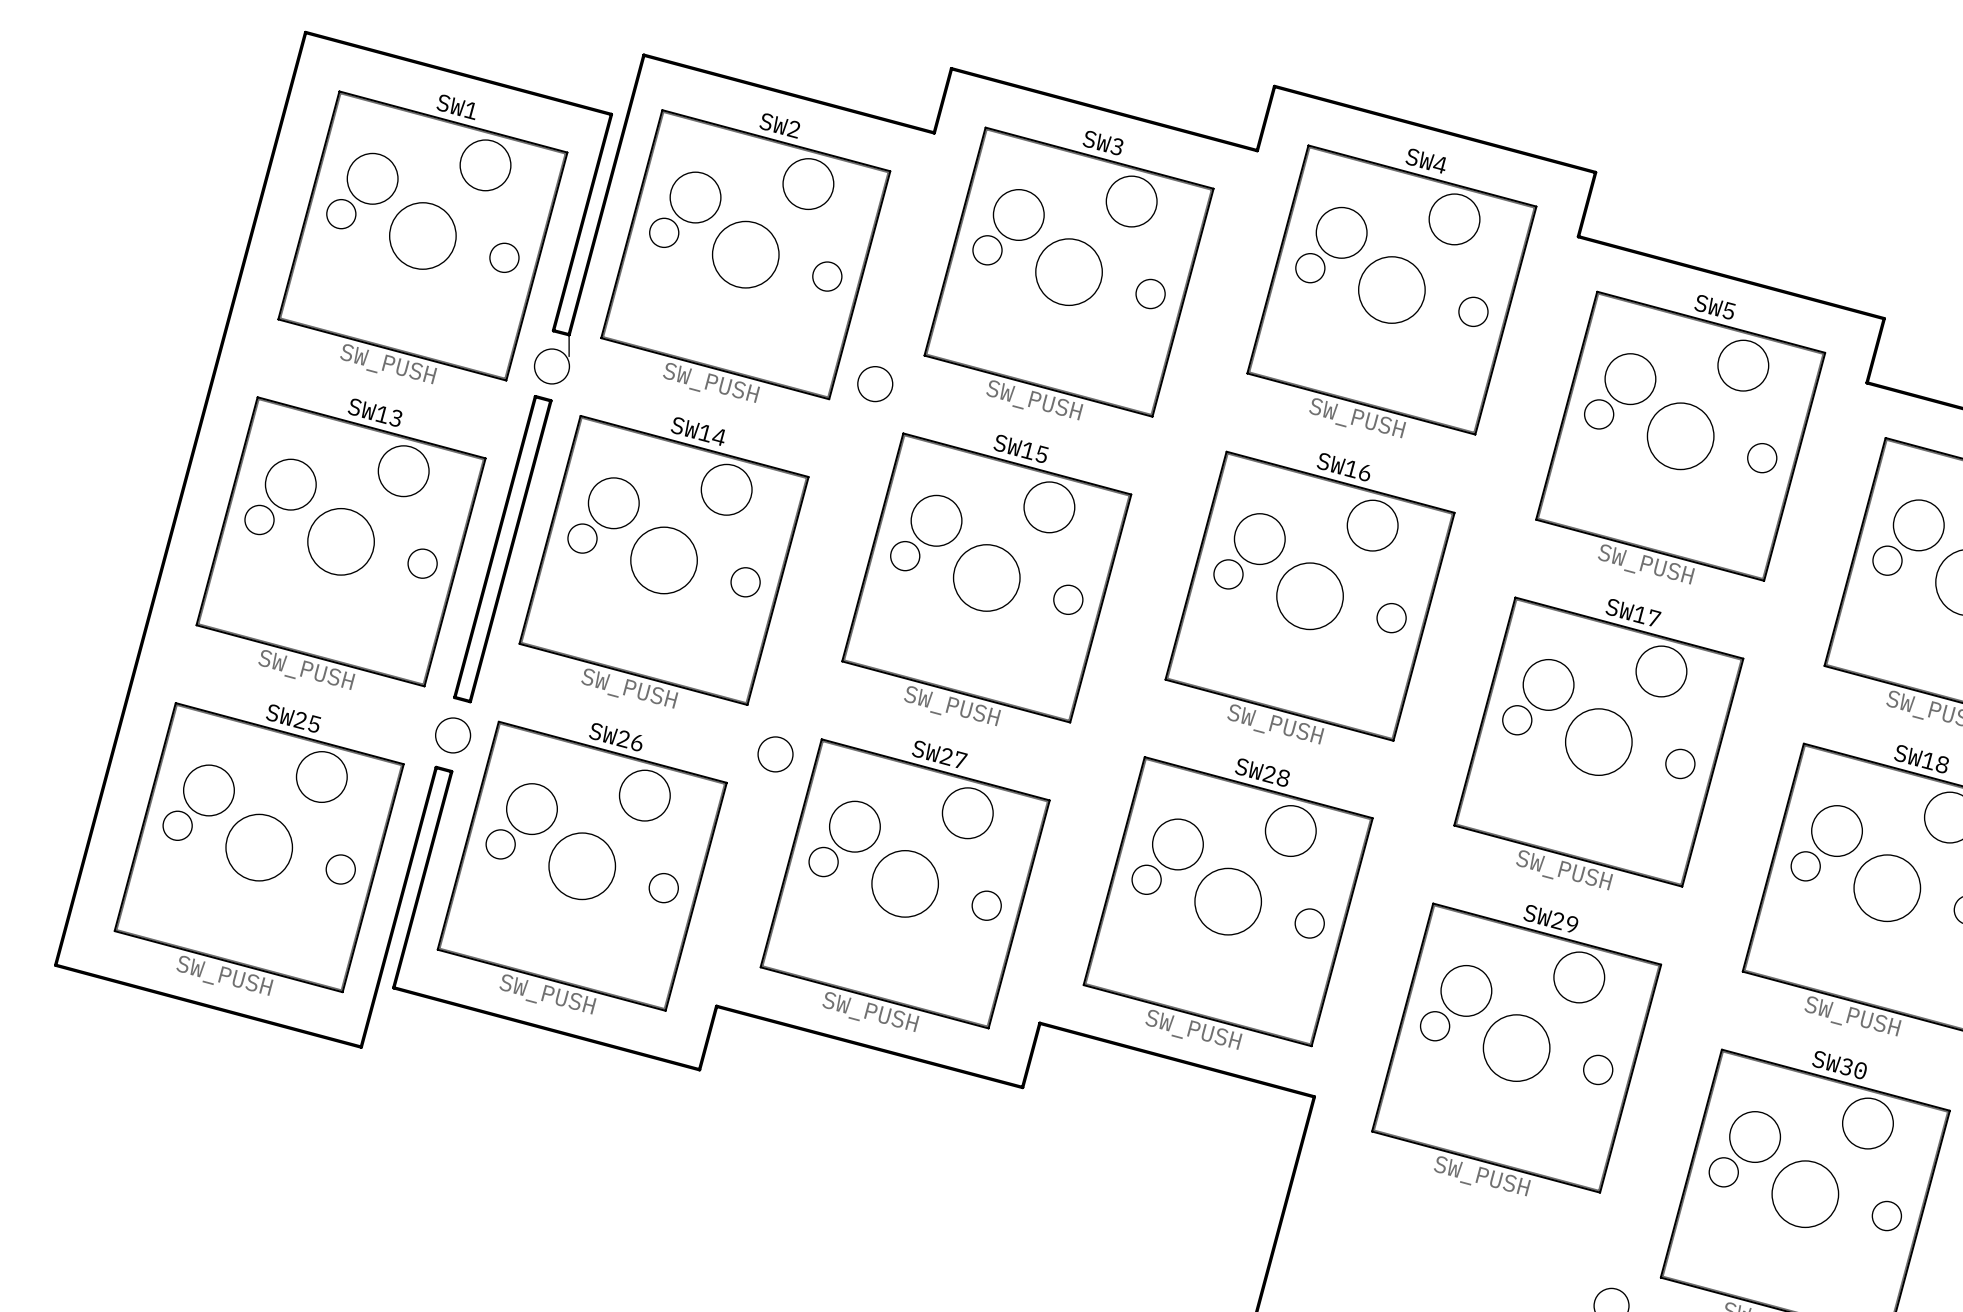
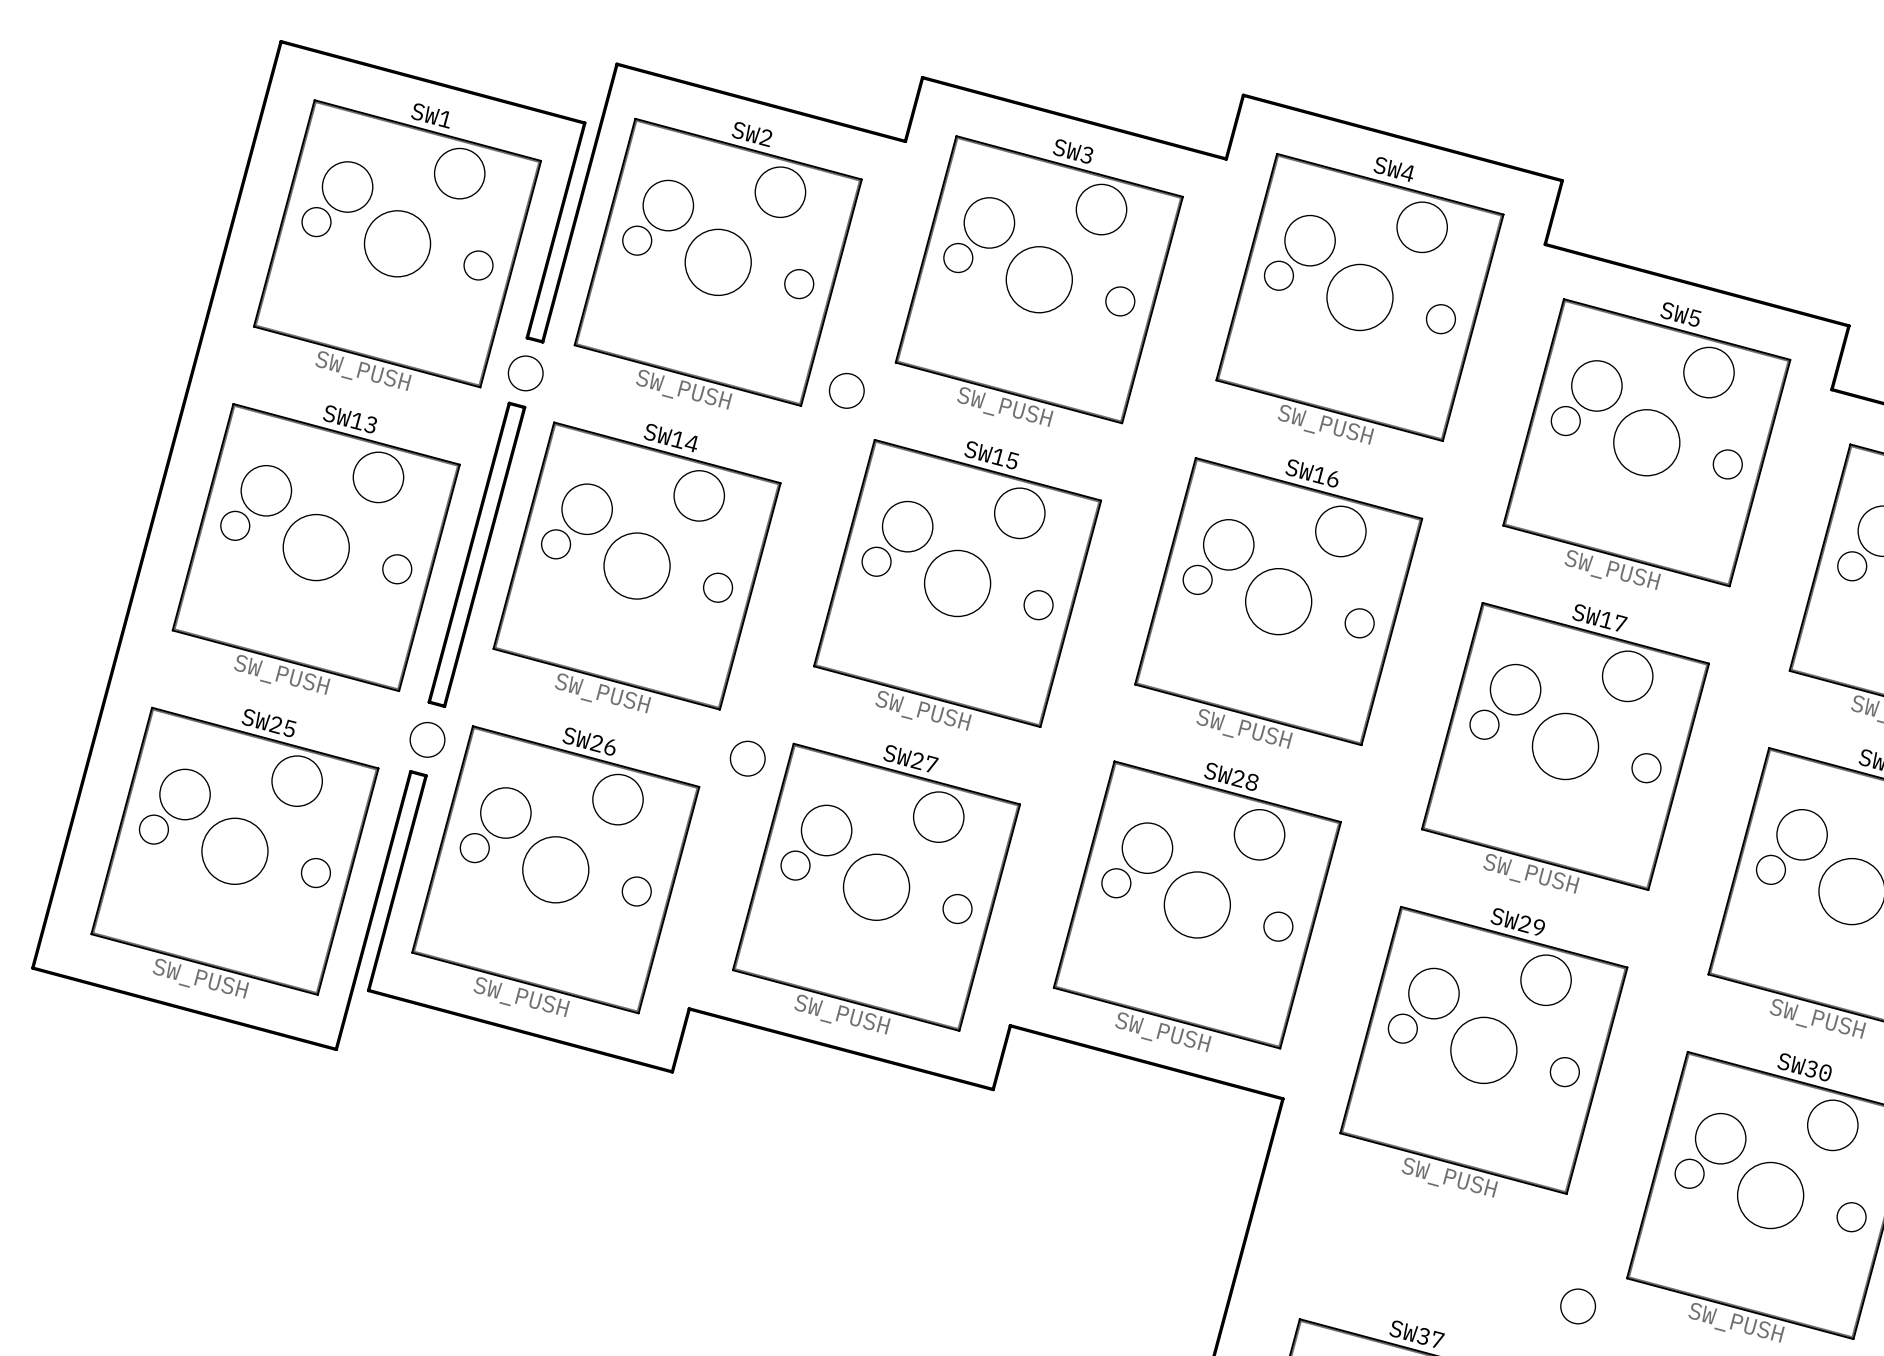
board edge: (569, 334) (569, 356) -> none

